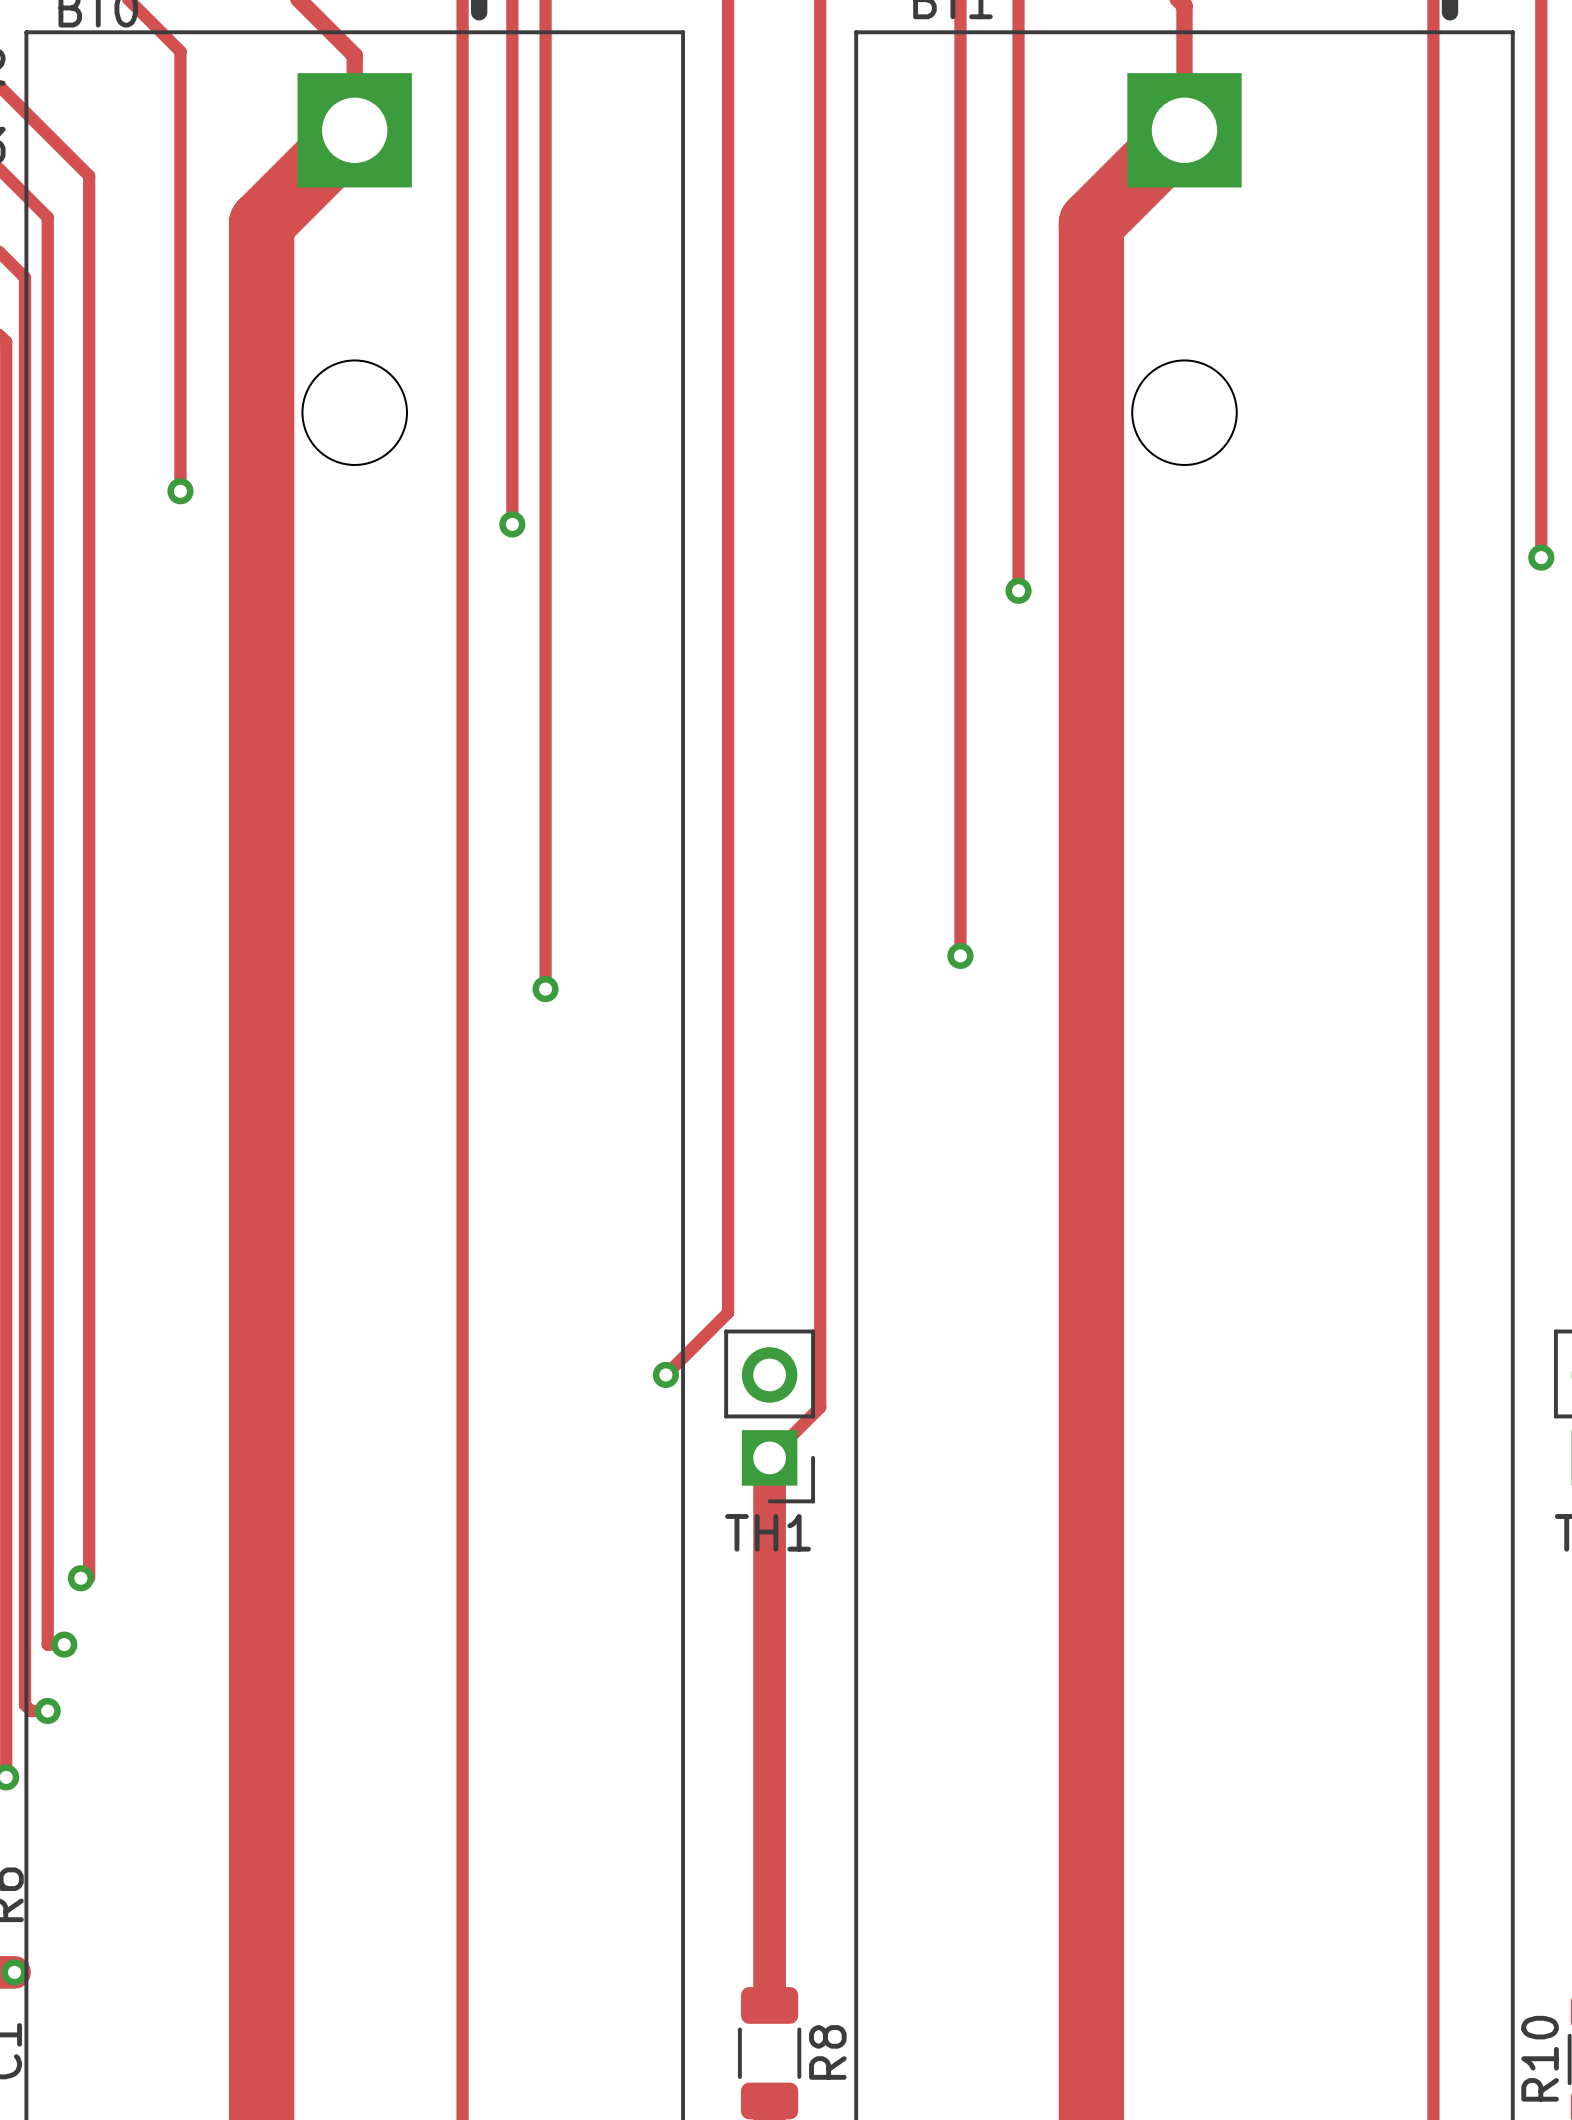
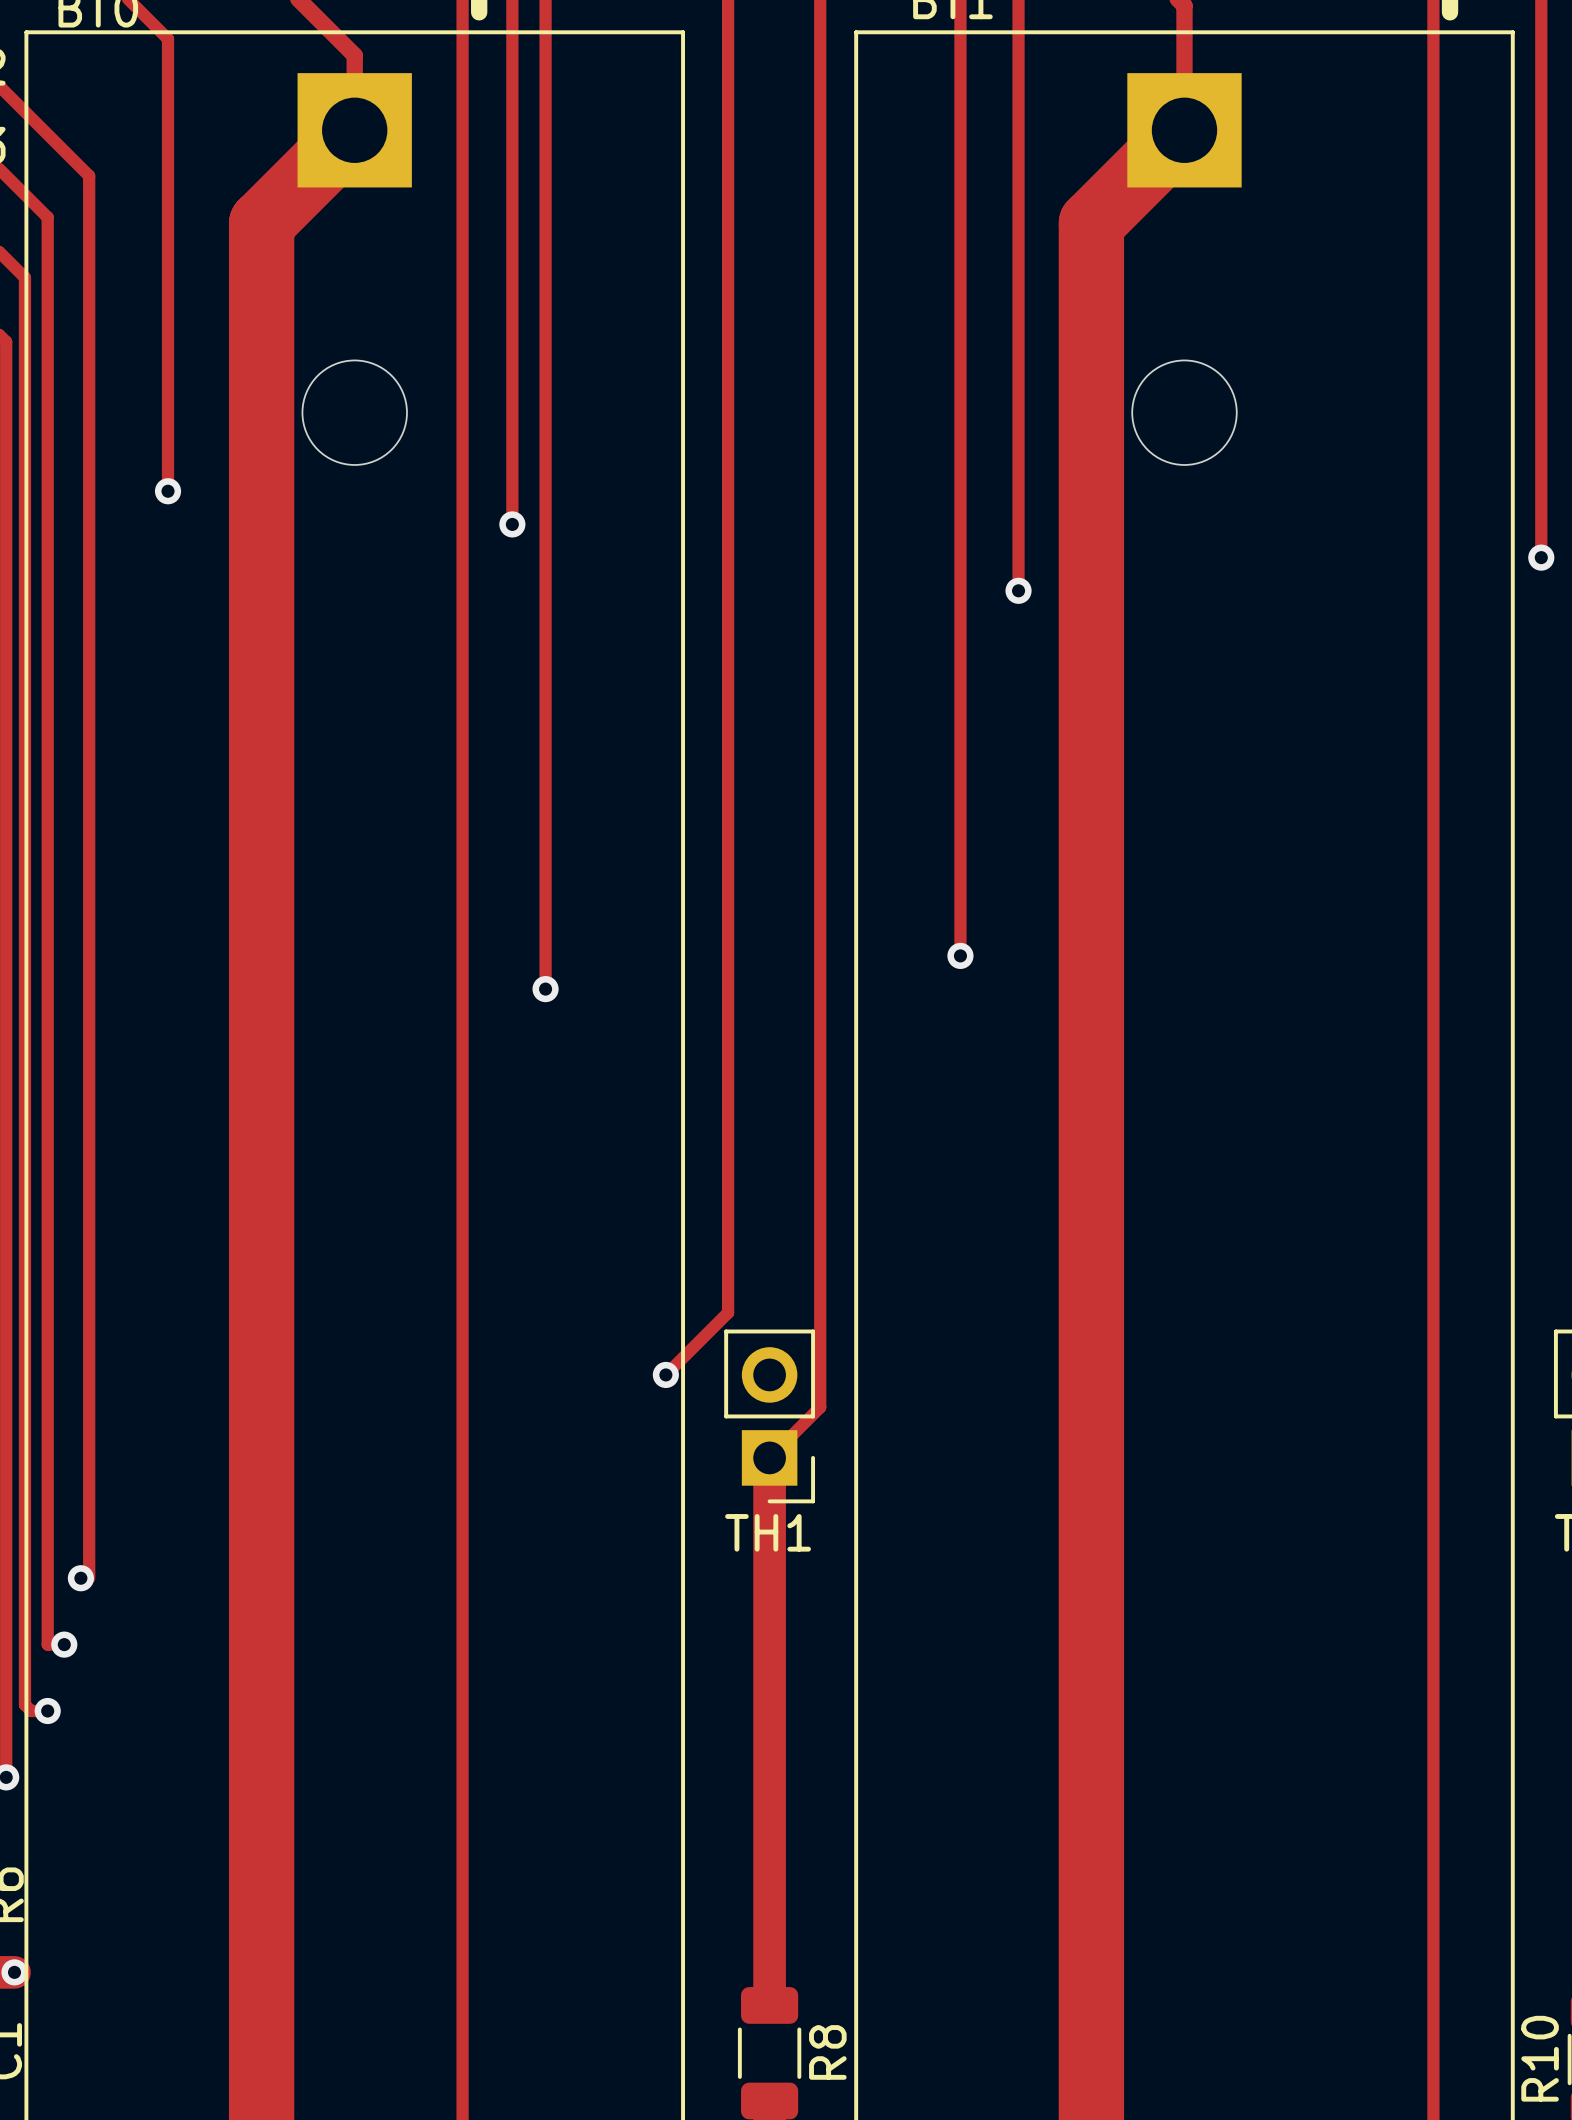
track: (168, 39) (180, 51) (180, 491) -> (168, 39) (168, 491)
via position: (180, 491) -> (168, 491)

